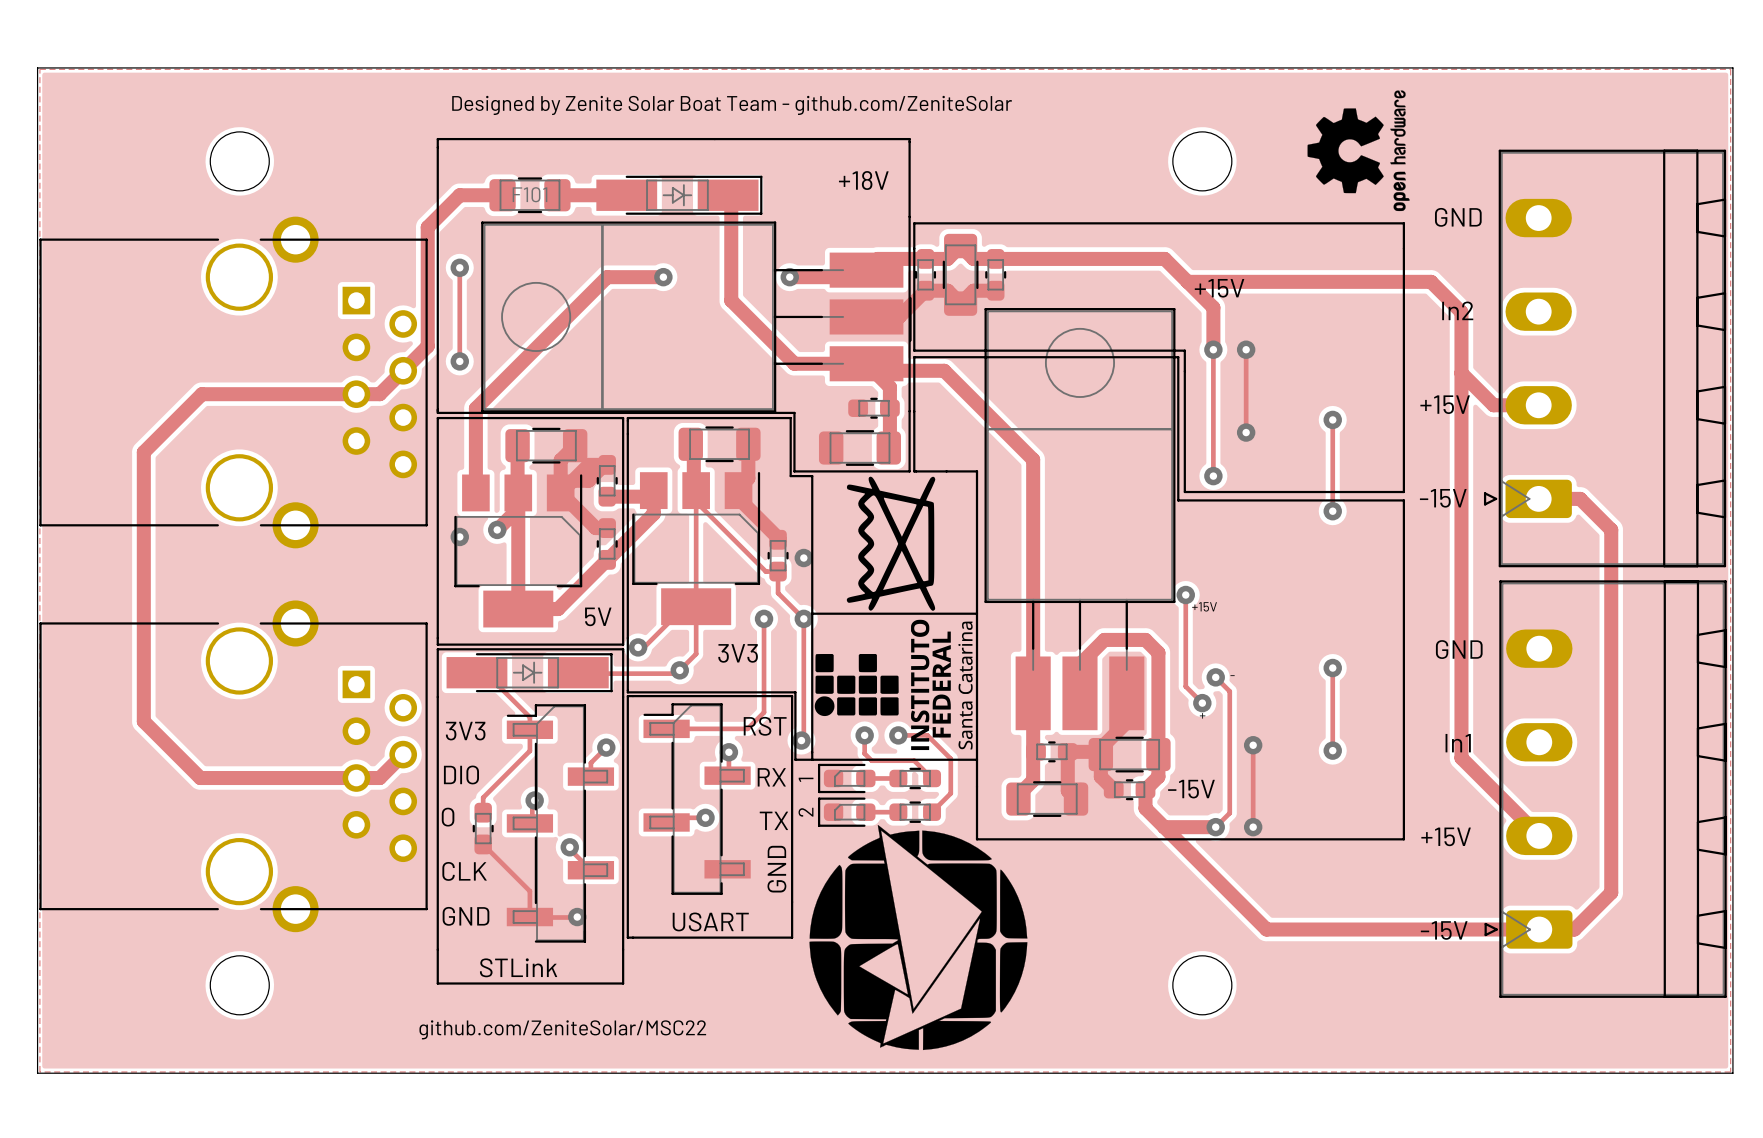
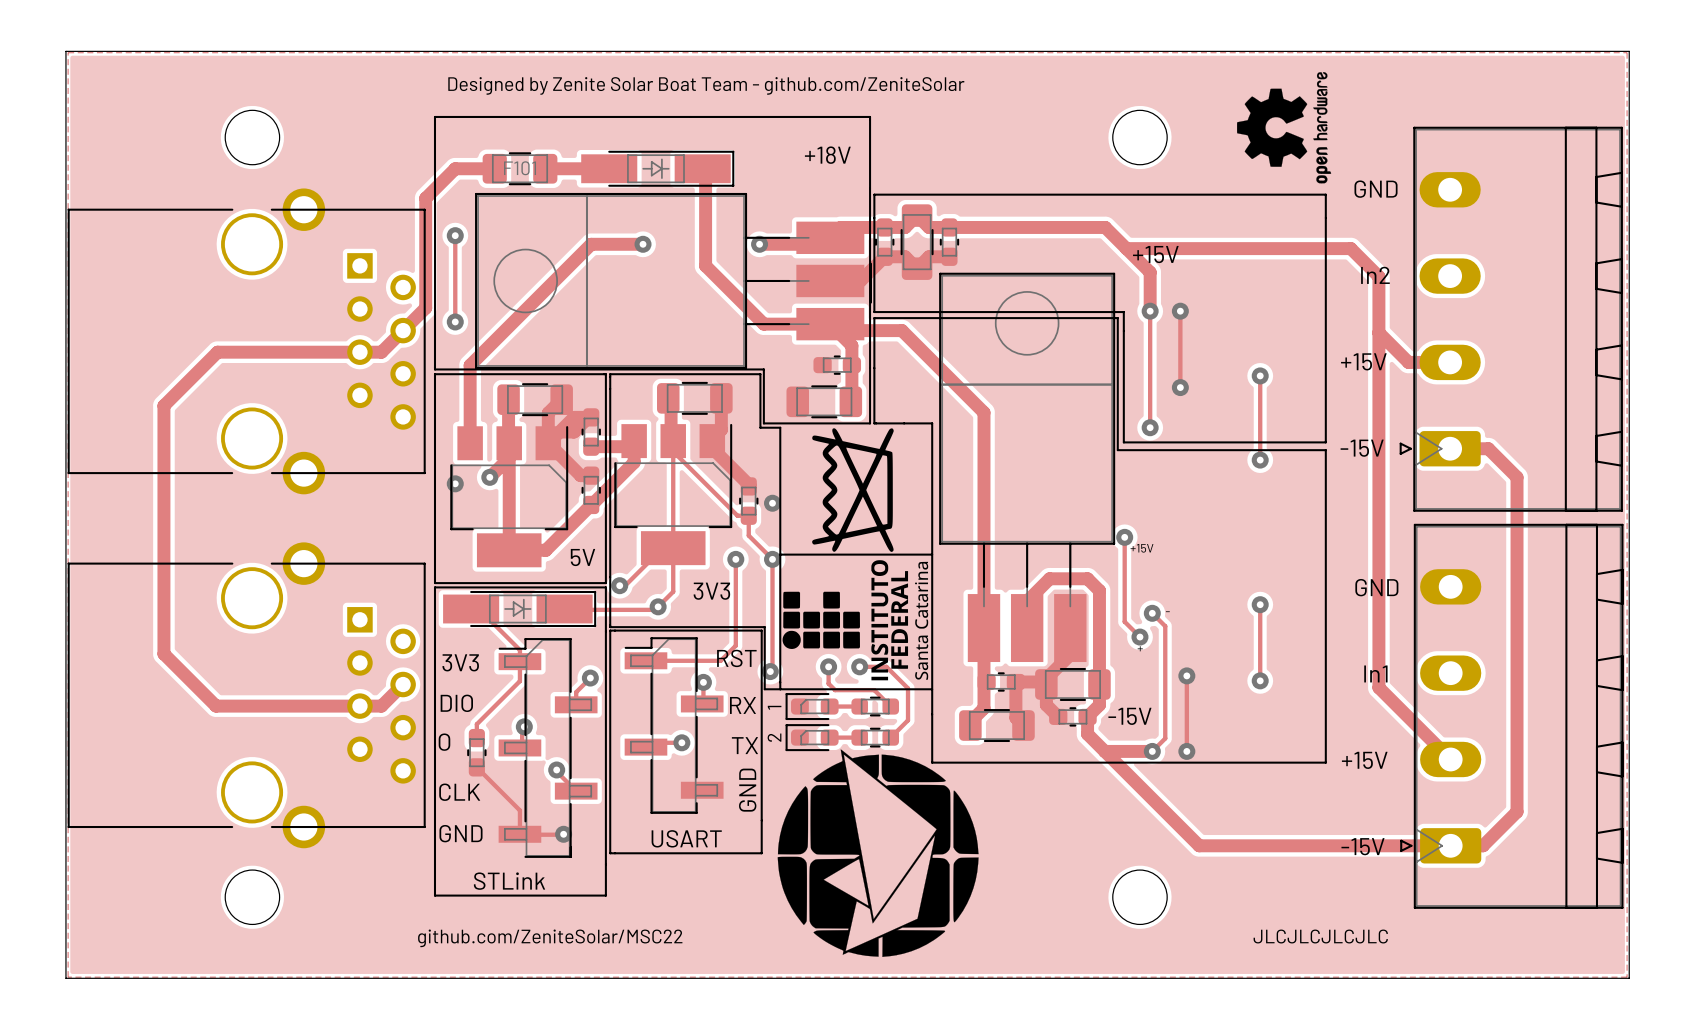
text: none -> JLCJLCJLCJLC (1320, 936)

